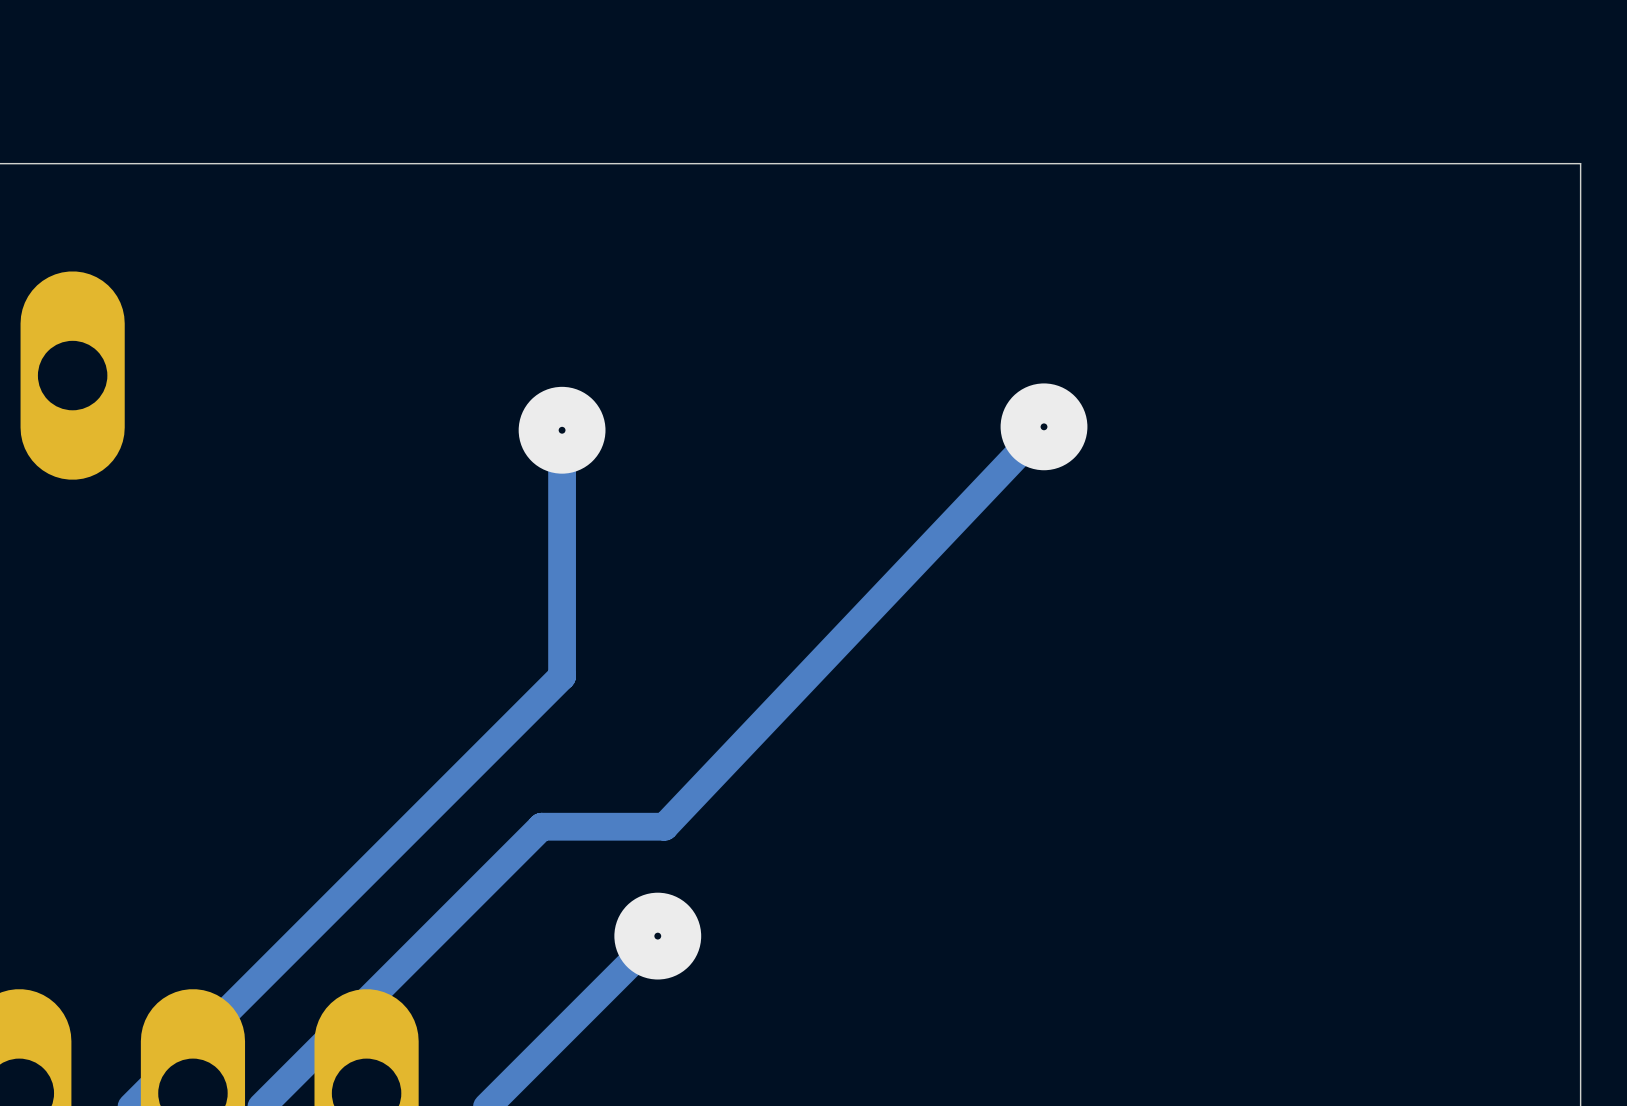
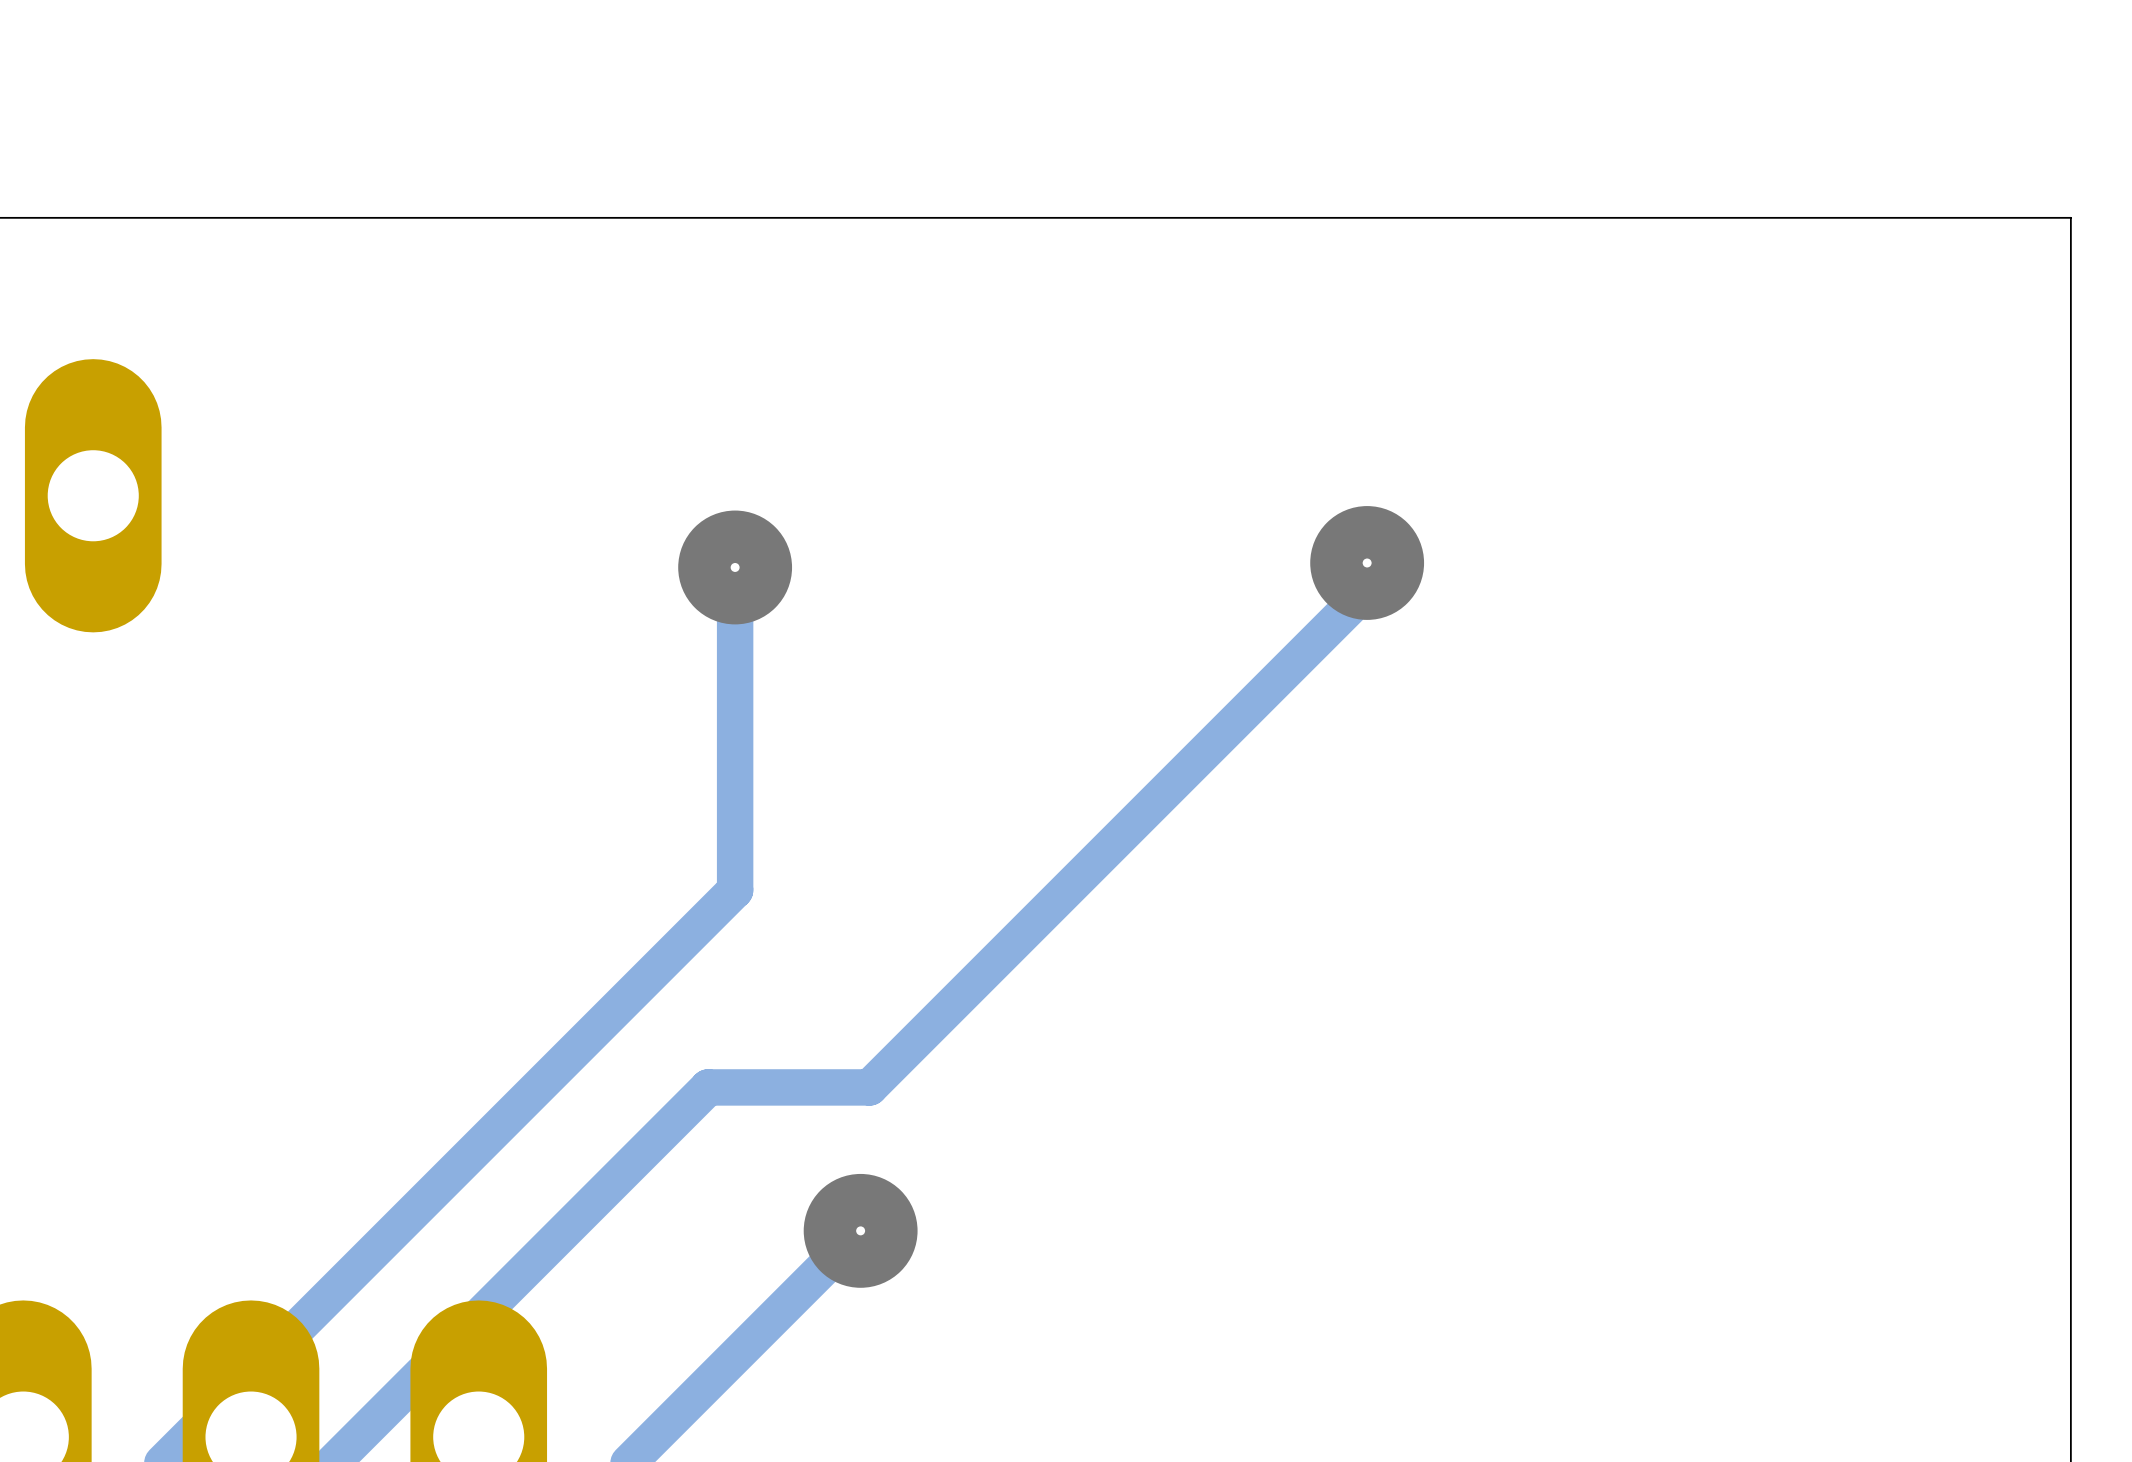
track: (1044, 426) (664, 826) -> (1367, 562) (1367, 589) (869, 1087)

